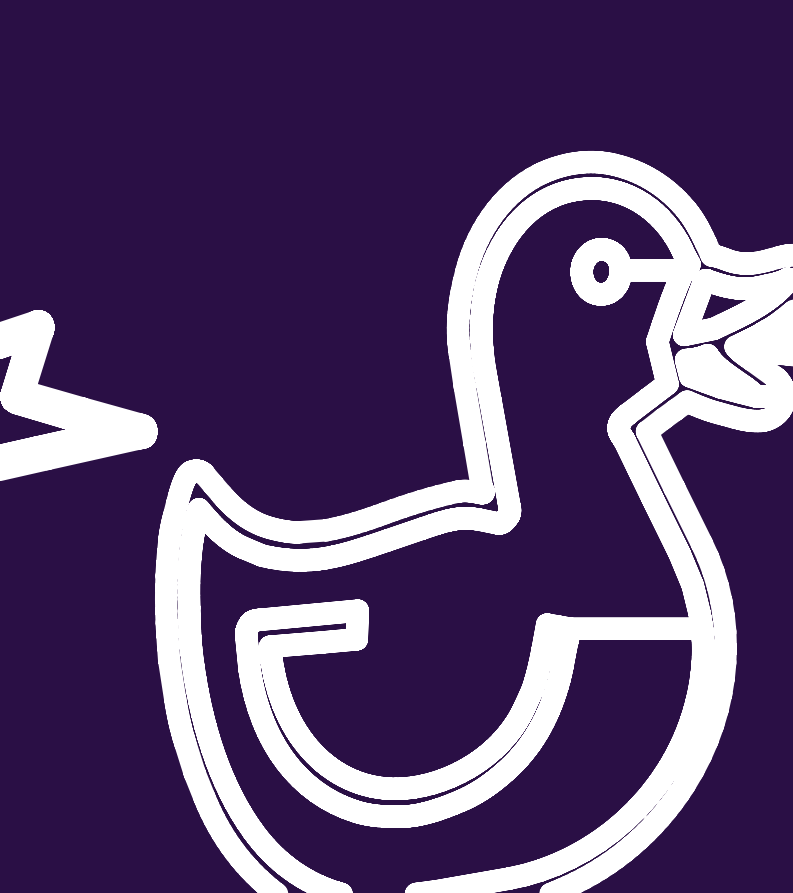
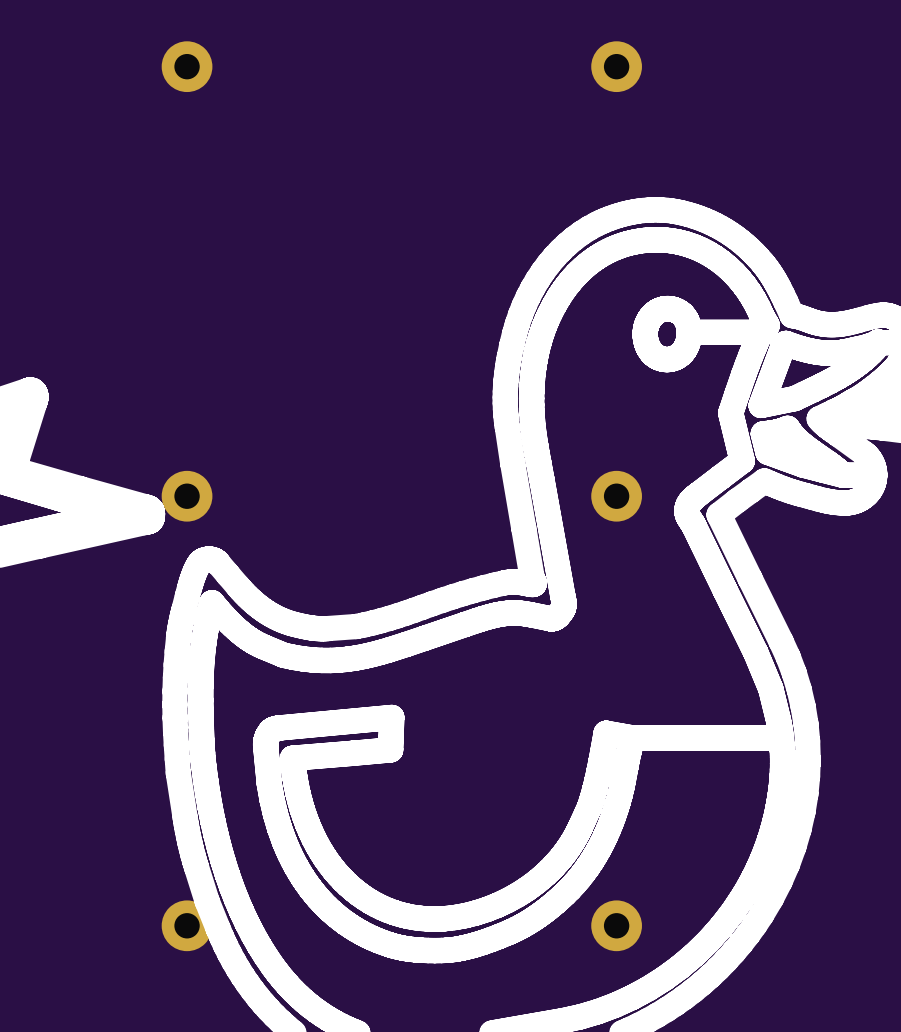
via: none -> (187, 66)
via: none -> (616, 66)
via: none -> (187, 496)
via: none -> (616, 496)
via: none -> (187, 925)
via: none -> (616, 925)

